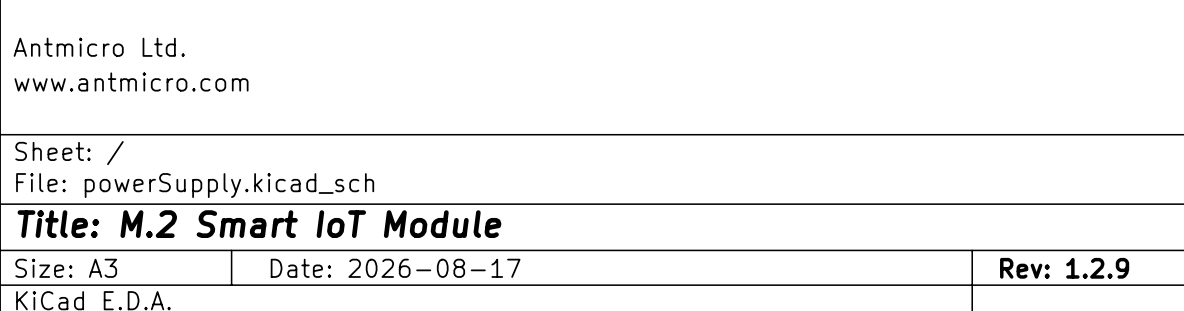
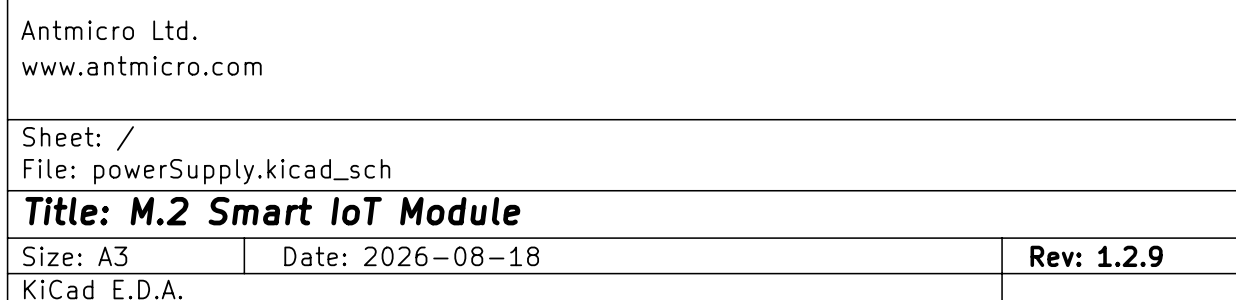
title block: Date: 2026-08-17 (395, 268) -> Date: 2026-08-18 (411, 256)

